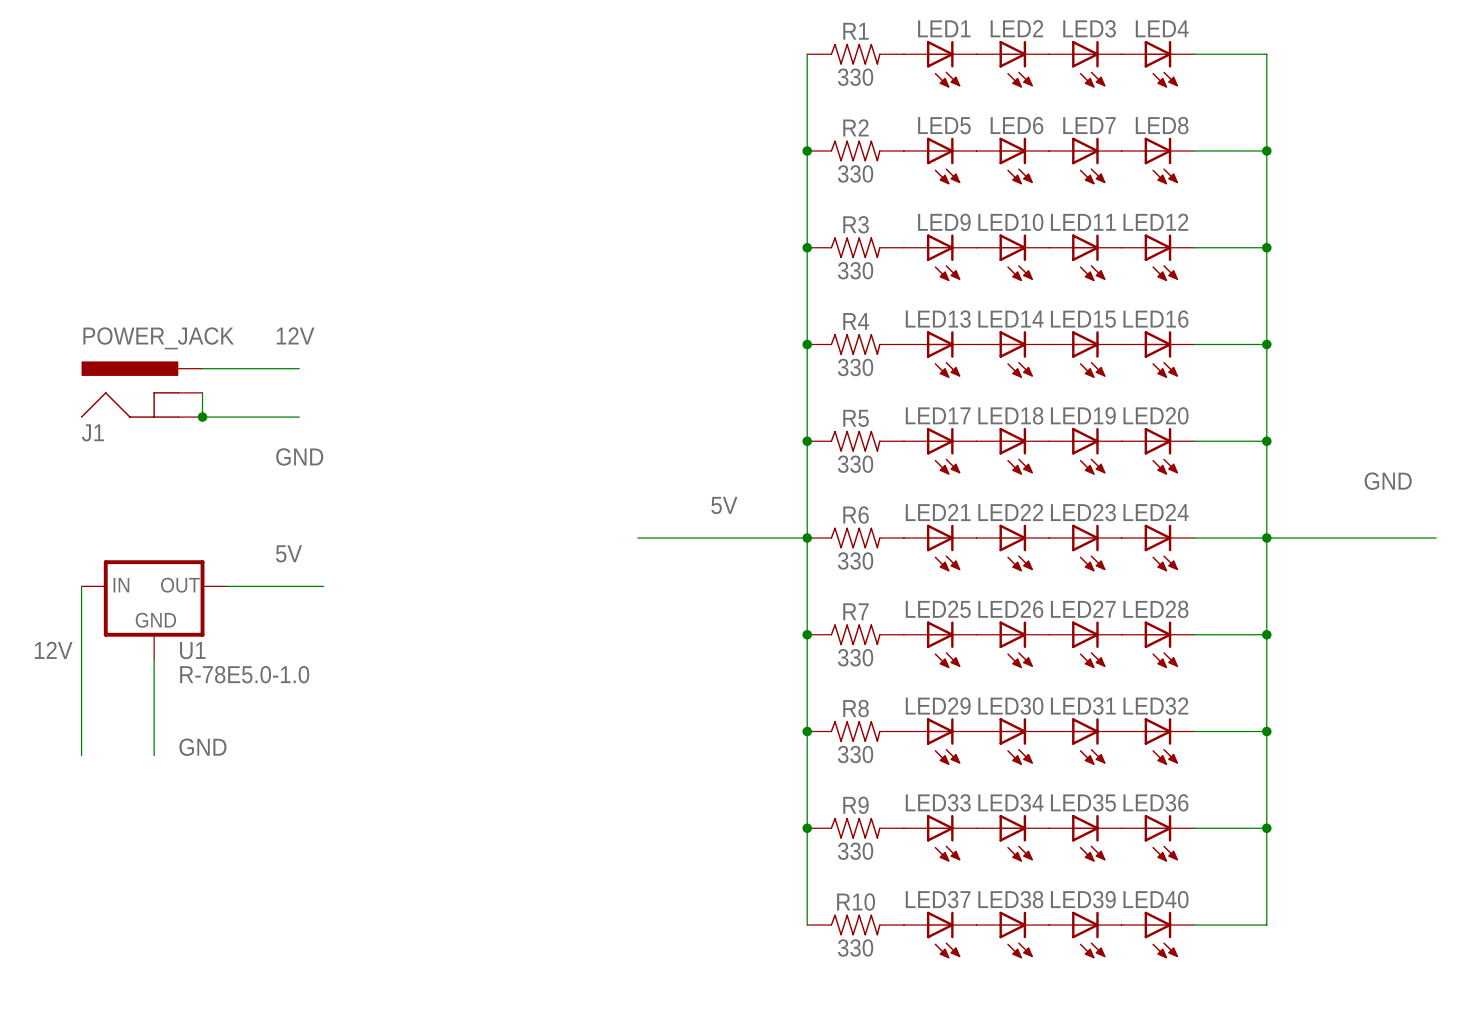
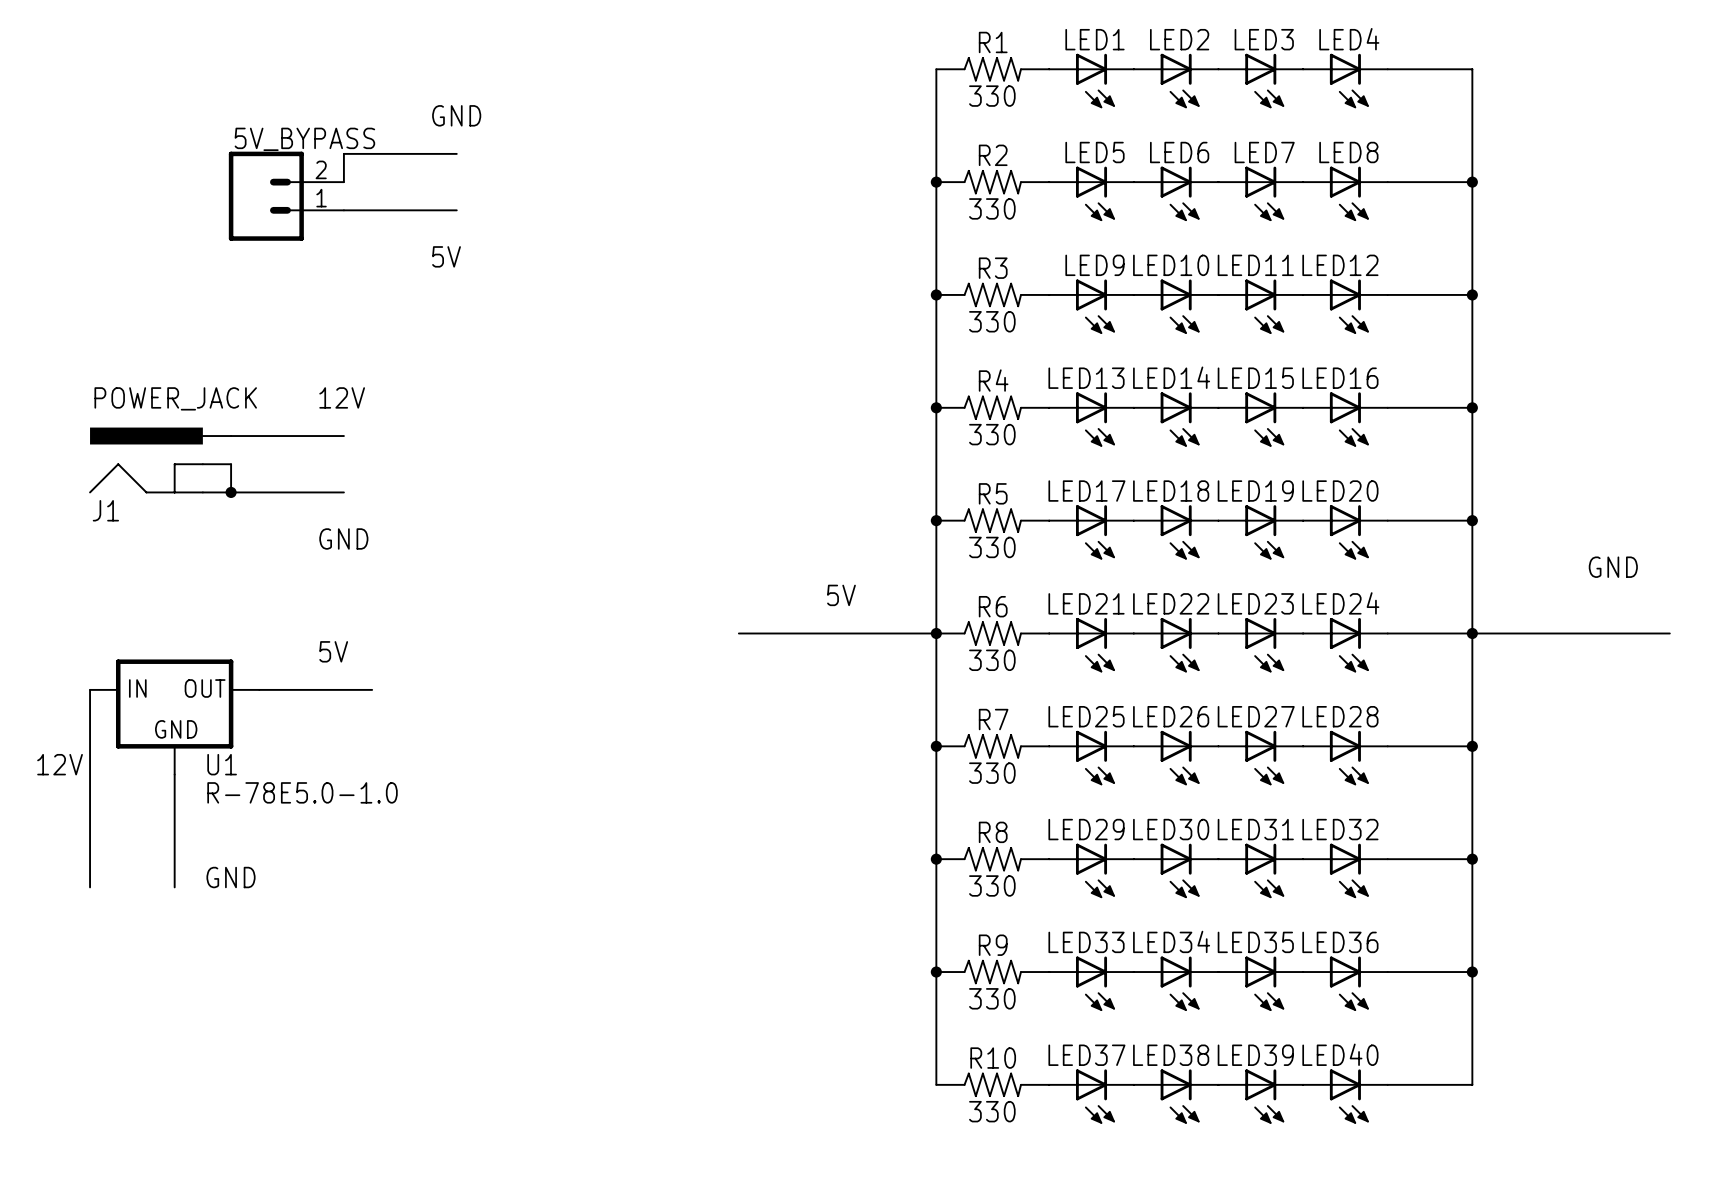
label: none -> GND (456, 115)
wire: none -> (456, 153) (343, 153) (343, 182)
5V_BYPASS: none -> (286, 196)
wire: none -> (343, 210) (456, 210)
label: none -> 5V (446, 256)

